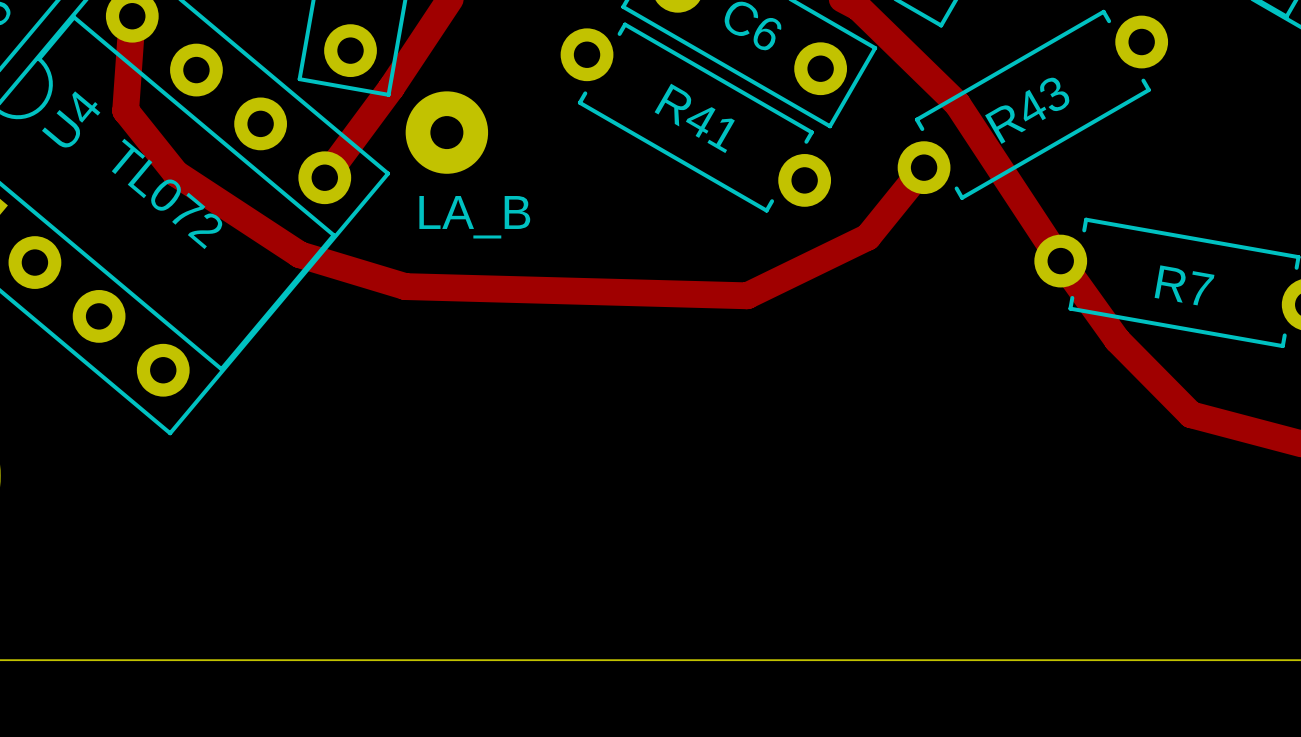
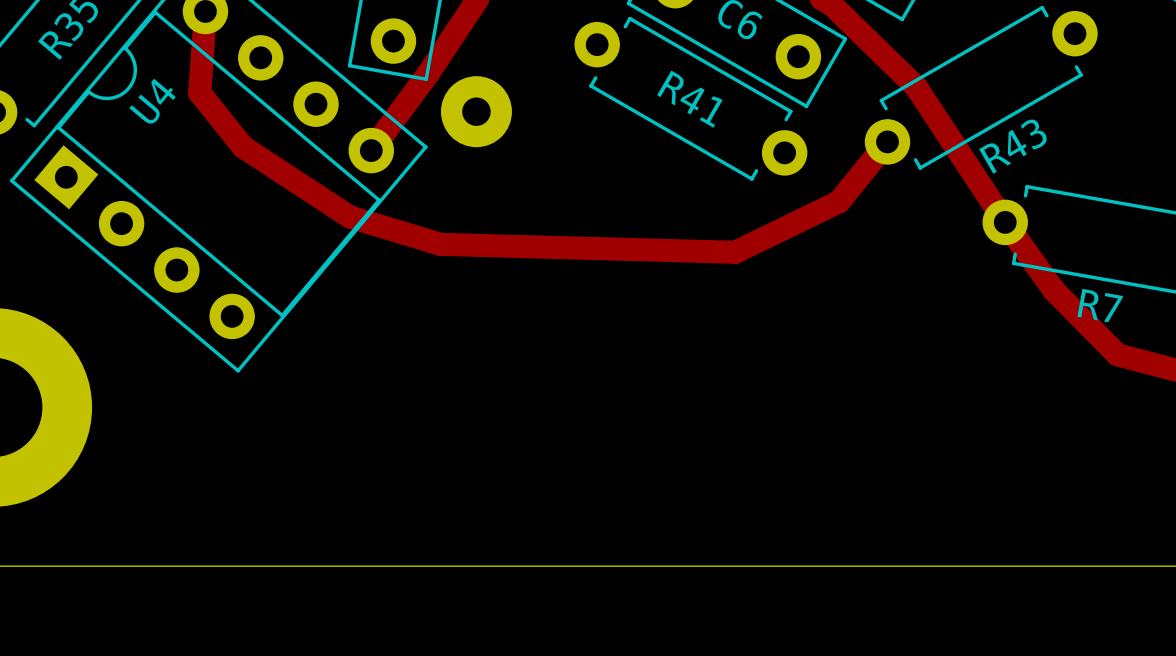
R43 name position: R43 (1027, 110) -> R43 (1013, 146)
text: TL072 (167, 193) -> none
text: LA_B (474, 217) -> none
R7 name position: R7 (1184, 285) -> R7 (1100, 305)

